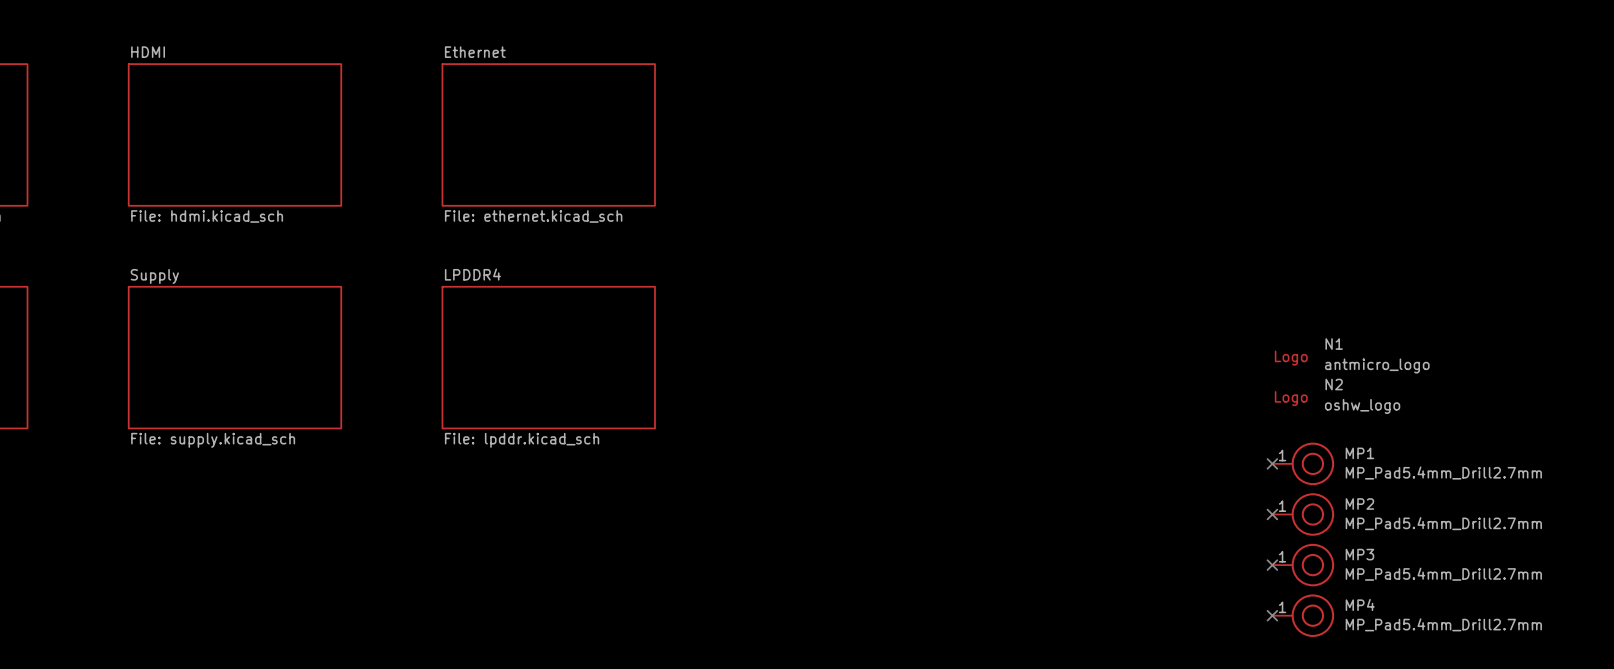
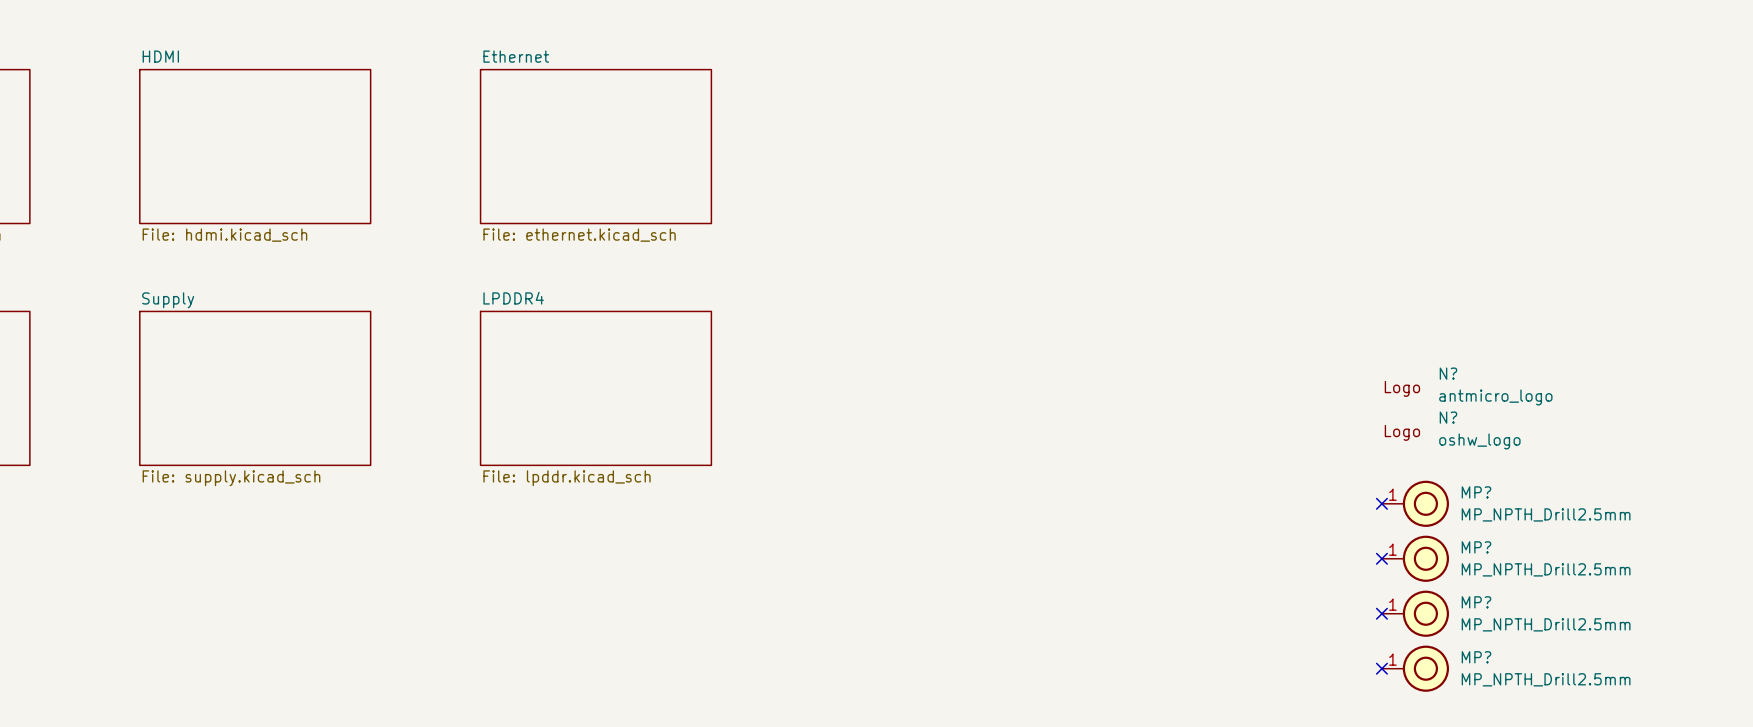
N1 name: N1 (1334, 344) -> N? (1448, 373)
N2 name: N2 (1334, 384) -> N? (1448, 417)
MP1 name: MP1 (1359, 453) -> MP? (1476, 492)
MP1 value: MP_Pad5.4mm_Drill2.7mm (1443, 473) -> MP_NPTH_Drill2.5mm (1546, 514)
MP2 name: MP2 (1359, 503) -> MP? (1476, 547)
MP2 value: MP_Pad5.4mm_Drill2.7mm (1443, 523) -> MP_NPTH_Drill2.5mm (1546, 569)
MP3 name: MP3 (1359, 554) -> MP? (1476, 602)
MP3 value: MP_Pad5.4mm_Drill2.7mm (1443, 574) -> MP_NPTH_Drill2.5mm (1546, 624)
MP4 name: MP4 (1360, 604) -> MP? (1476, 657)
MP4 value: MP_Pad5.4mm_Drill2.7mm (1443, 624) -> MP_NPTH_Drill2.5mm (1546, 679)

